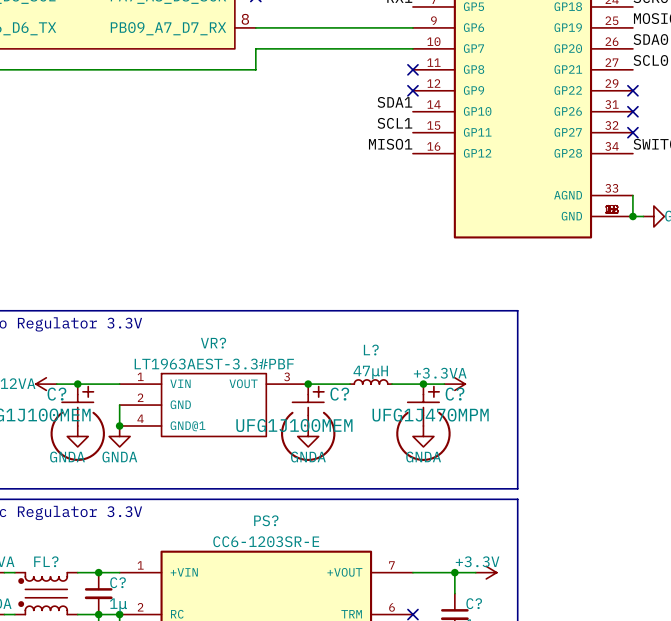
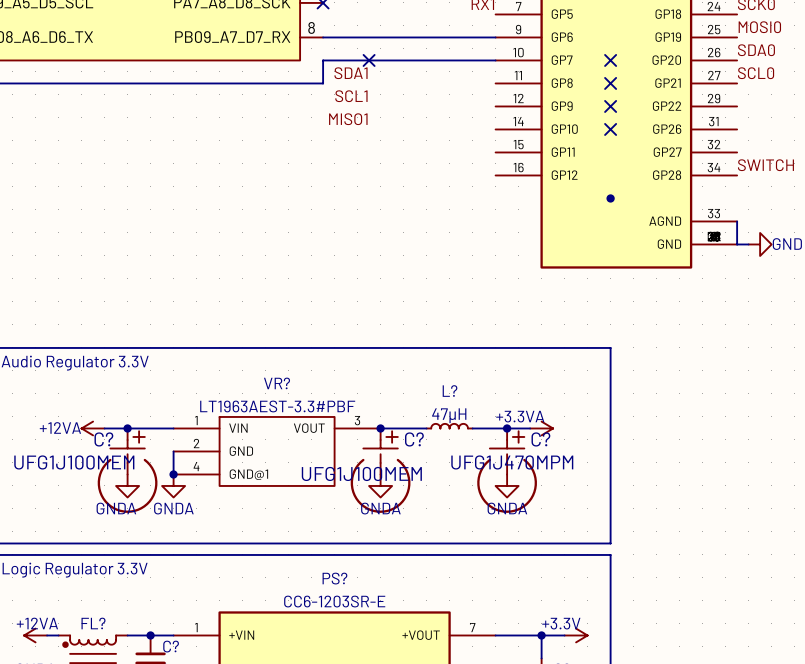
no-connect mark: none -> (369, 60)
no-connect mark: none -> (610, 60)
no-connect mark: (412, 69) -> none
no-connect mark: none -> (610, 83)
no-connect mark: (412, 90) -> none
no-connect mark: none -> (610, 106)
no-connect mark: (632, 90) -> none
label position: SDA1 (394, 102) -> SDA1 (351, 73)
no-connect mark: none -> (610, 129)
no-connect mark: (632, 111) -> none
label position: SCL1 (394, 123) -> SCL1 (351, 96)
no-connect mark: (632, 132) -> none
label position: MISO1 (390, 144) -> MISO1 (348, 119)
junction: none -> (610, 198)
junction: (632, 216) -> none

